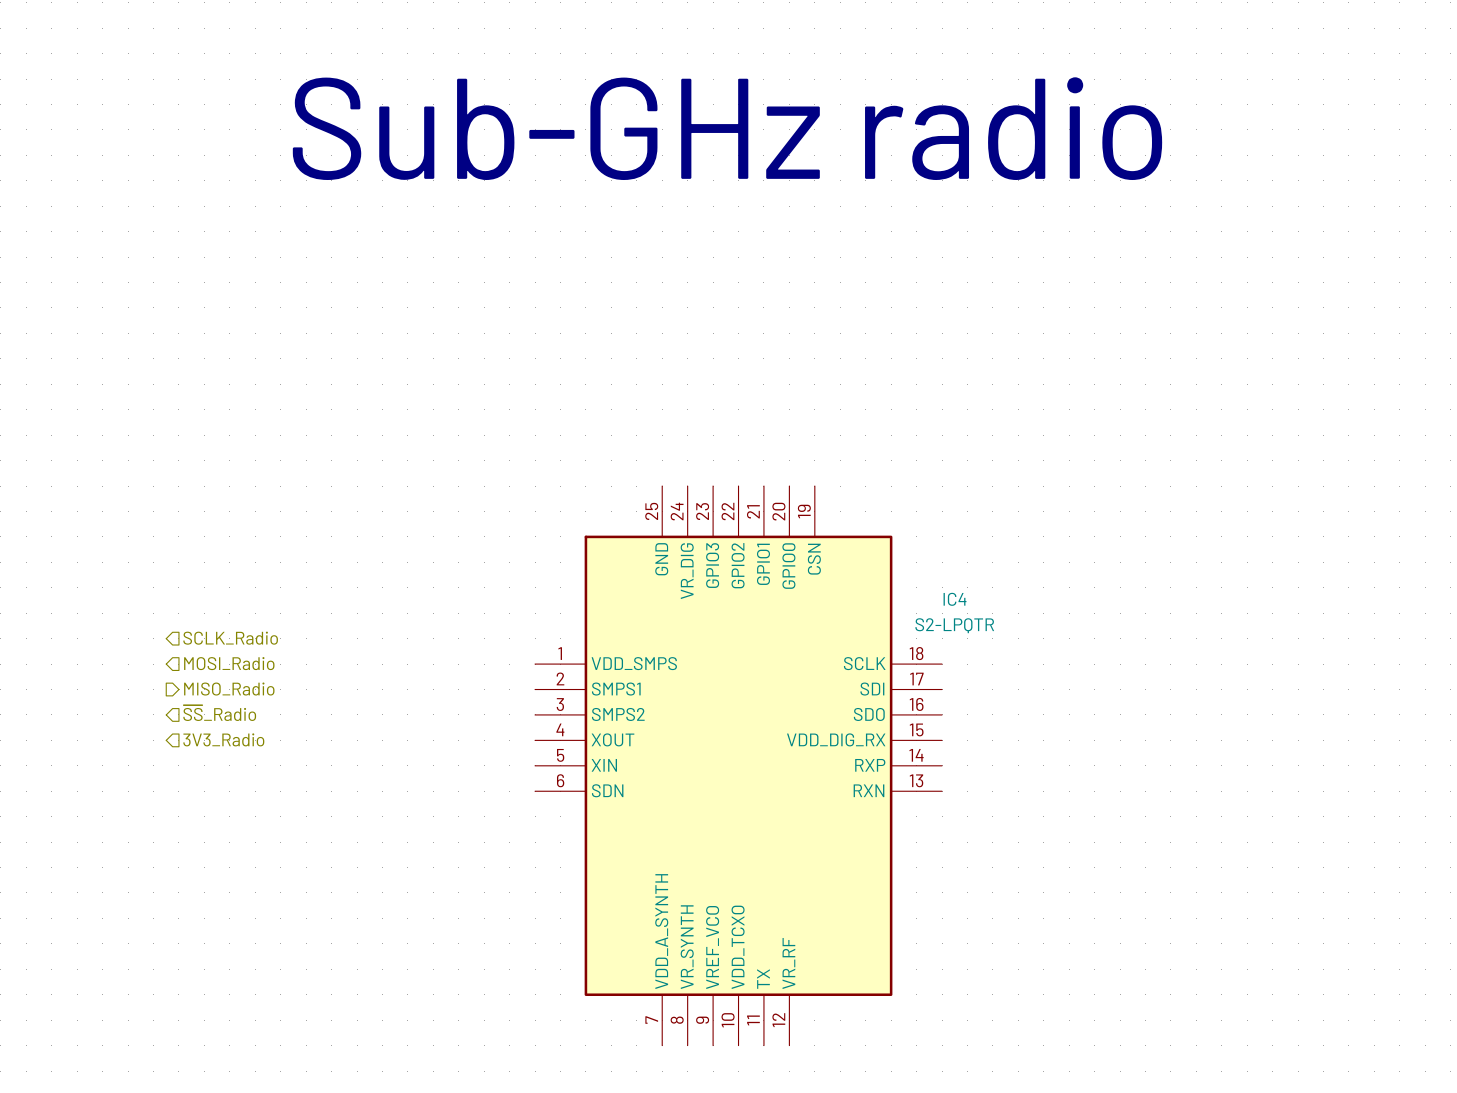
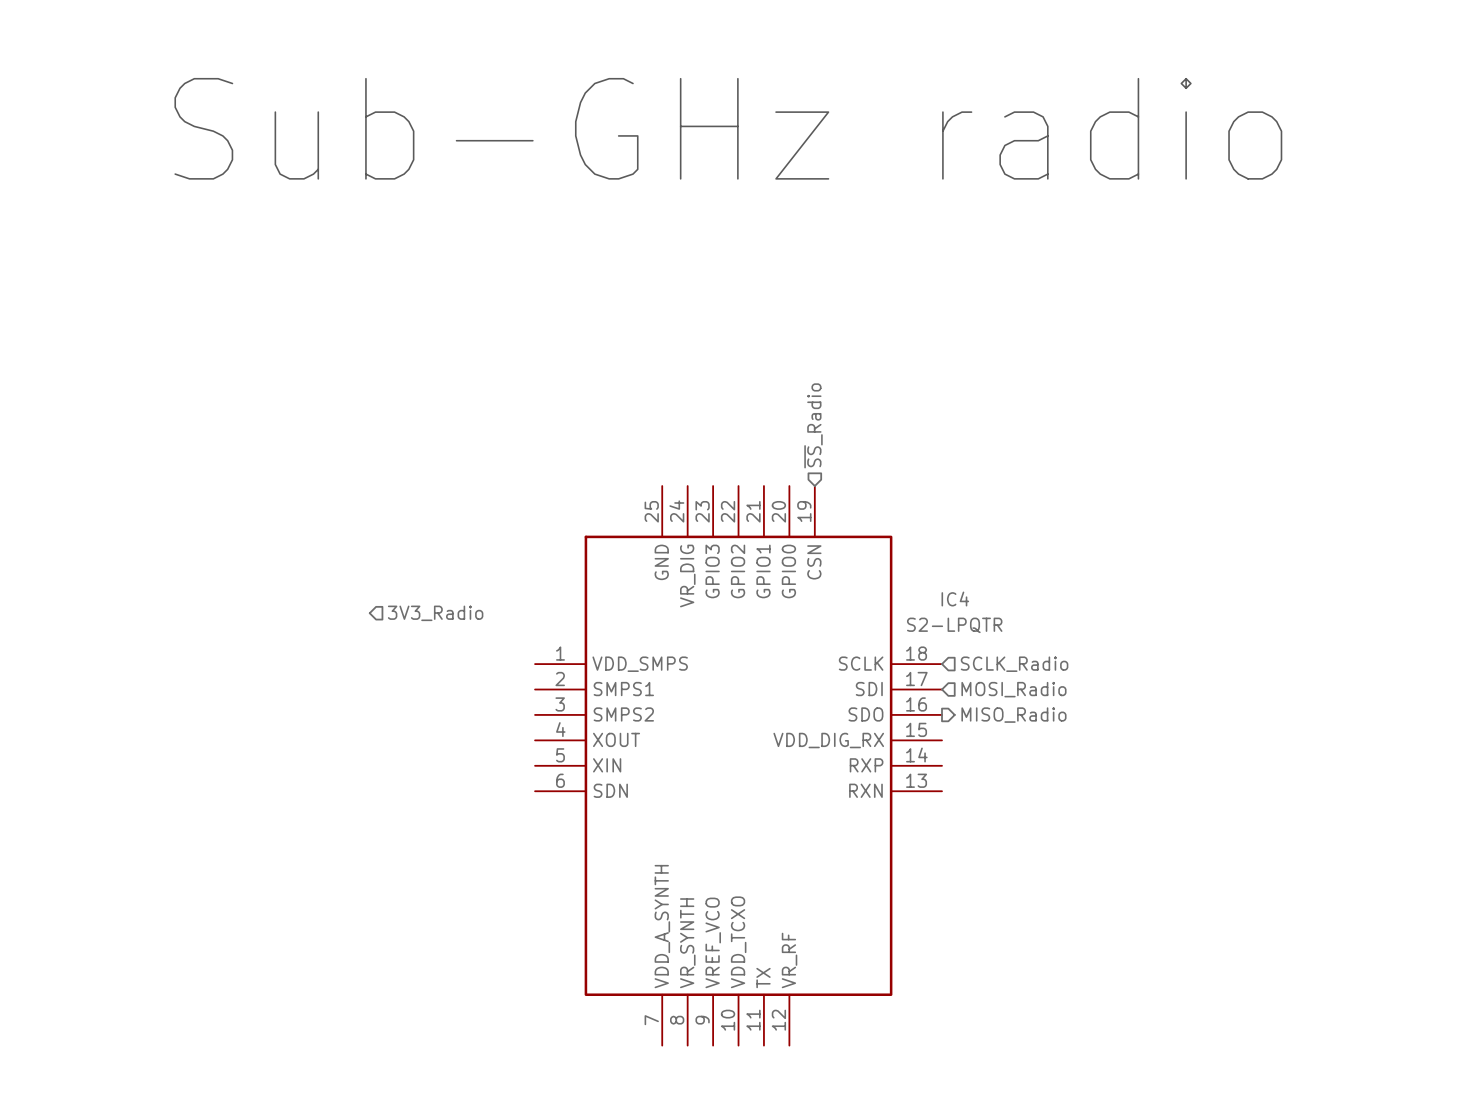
hierarchical label: none -> ~{SS}_Radio (813, 425)
hierarchical label: SCLK_Radio (230, 638) -> none
hierarchical label: MOSI_Radio (229, 663) -> none
hierarchical label: none -> SCLK_Radio (1014, 664)
hierarchical label: MISO_Radio (229, 689) -> none
hierarchical label: none -> MOSI_Radio (1013, 689)
hierarchical label: ~{SS}_Radio (219, 713) -> none
hierarchical label: none -> MISO_Radio (1013, 715)
hierarchical label position: 3V3_Radio (223, 739) -> 3V3_Radio (435, 613)

